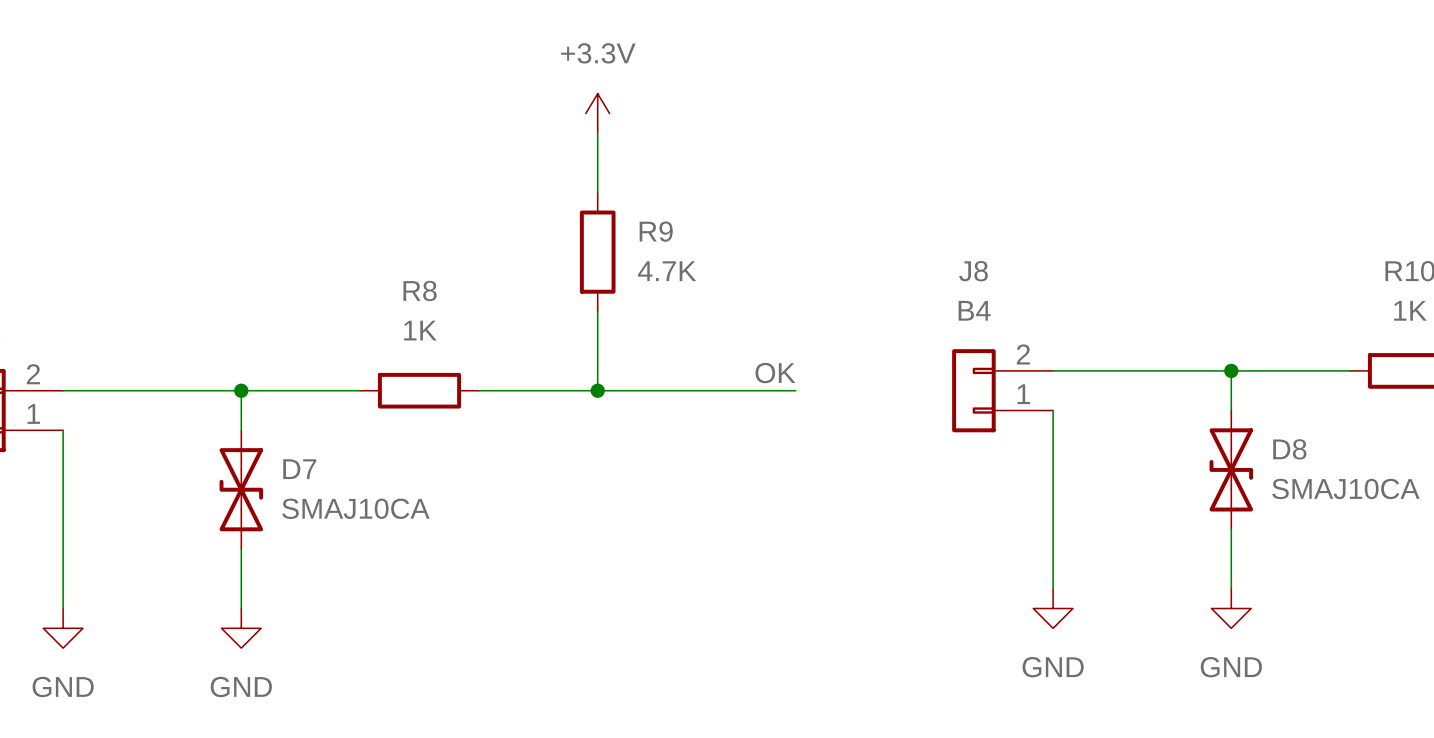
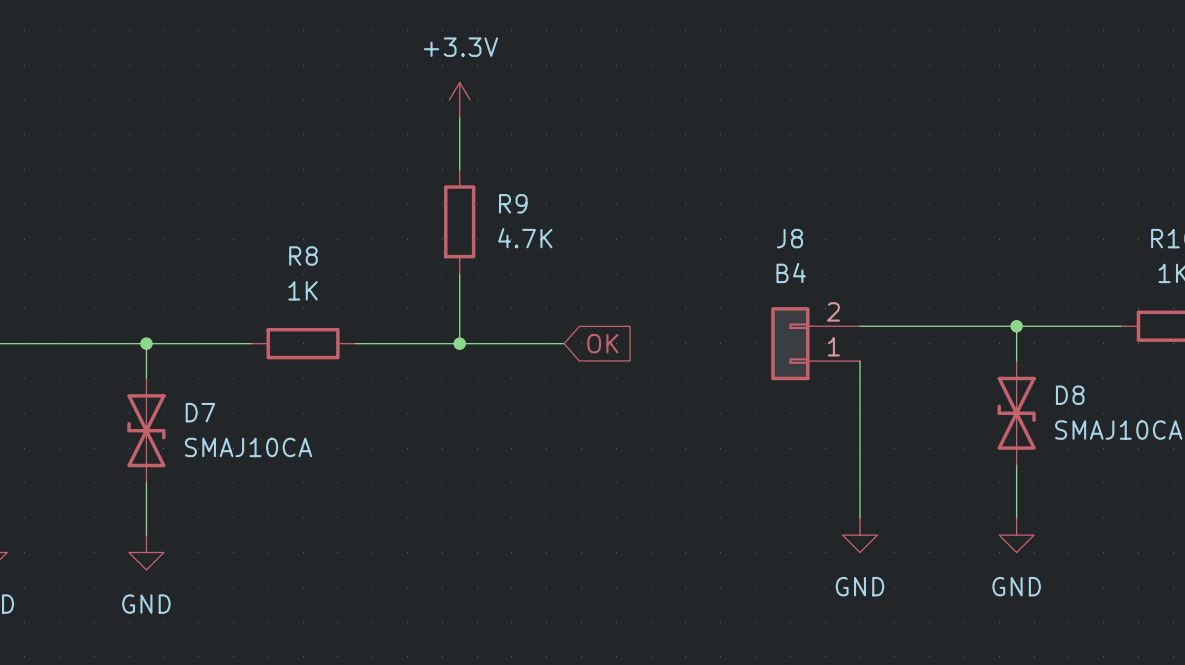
label: OK (775, 373) -> none
wire: (716, 390) (795, 390) -> none
global label: none -> OK (602, 343)

